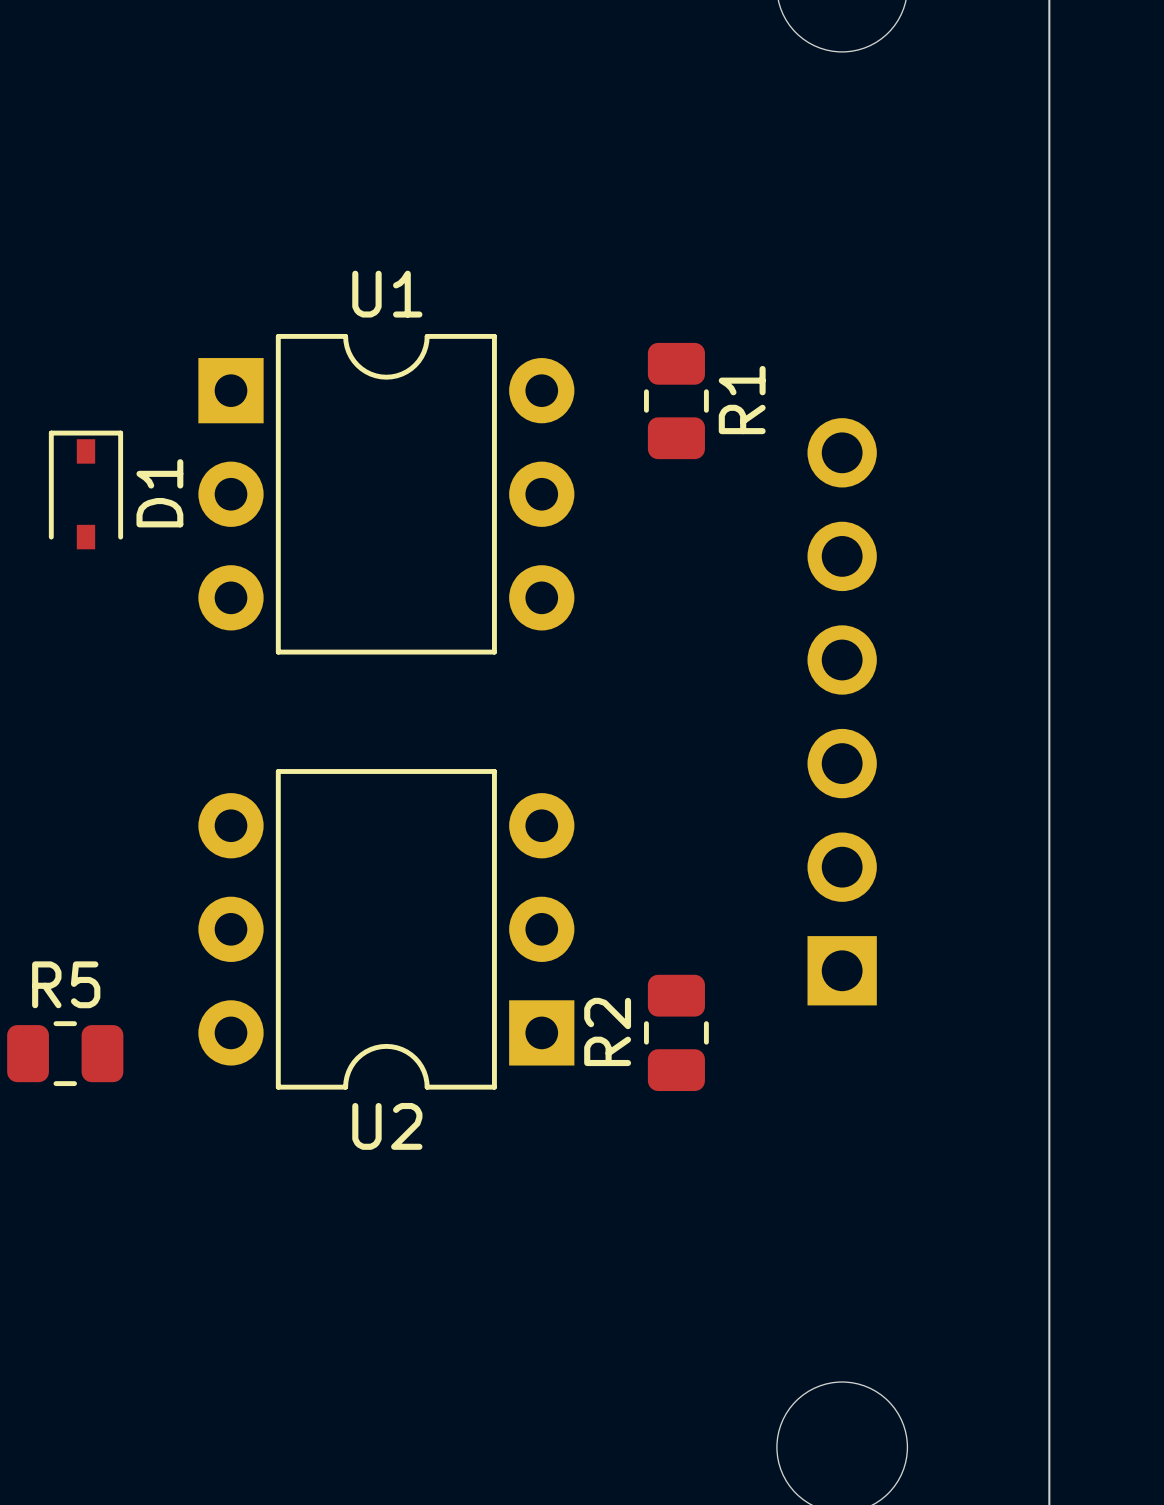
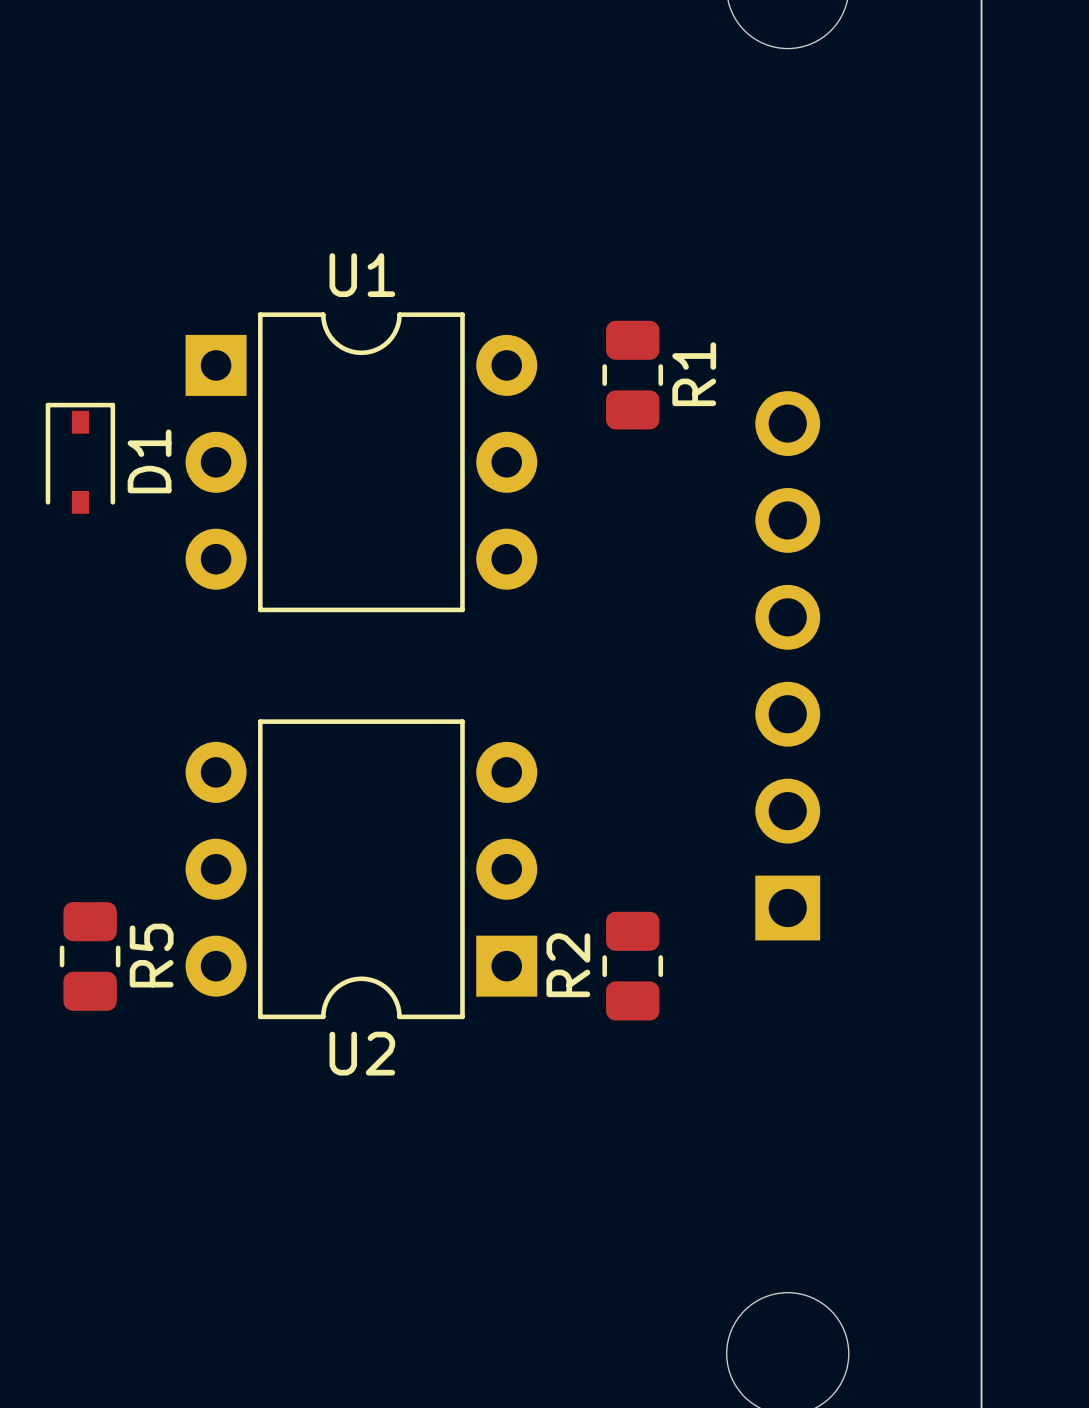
R5 rotation: 0° (65, 1053) -> 90° clockwise (90, 956)

